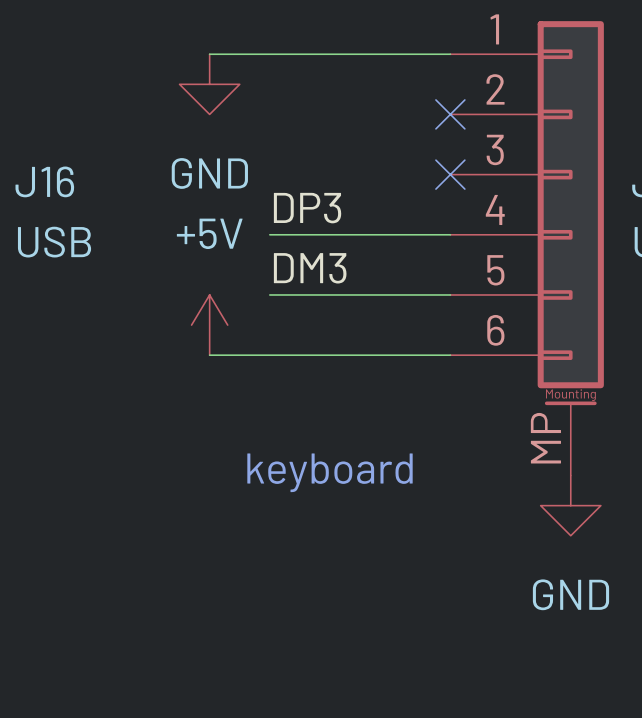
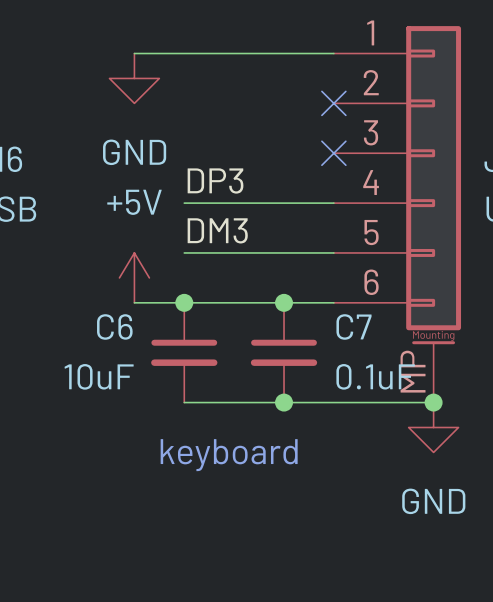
junction: none -> (184, 302)
junction: none -> (284, 302)
C6: none -> 10uF (184, 352)
C7: none -> 0.1uF (284, 352)
text position: keyboard (330, 472) -> keyboard (229, 455)
wire: none -> (184, 402) (433, 402)
junction: none -> (284, 402)
junction: none -> (433, 402)

